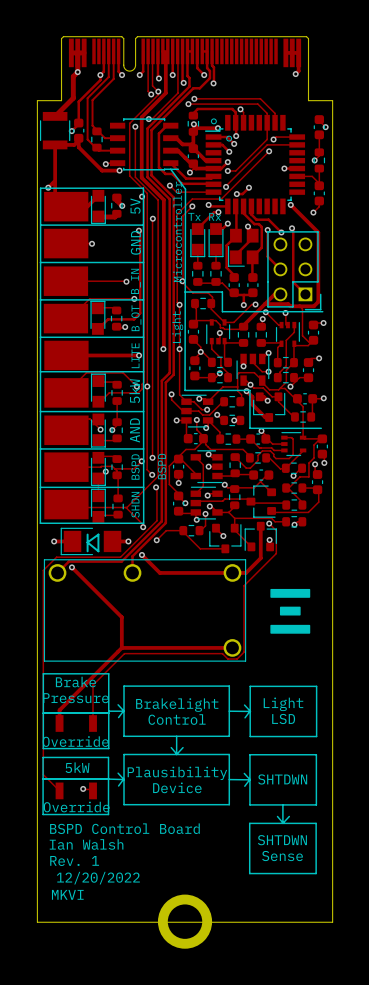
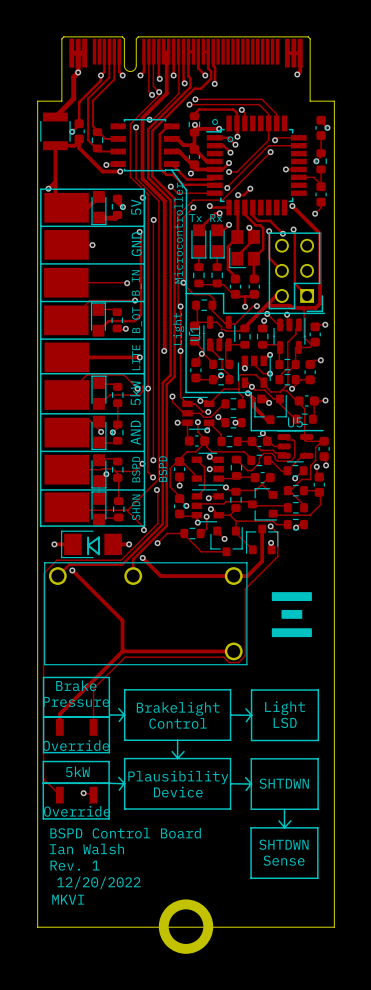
part footprint: [275, 321, 300, 347] -> [273, 317, 306, 355]
part: (218, 331) -> none
U1: none -> (219, 333)
part: (293, 444) -> none
U5: none -> (295, 446)

